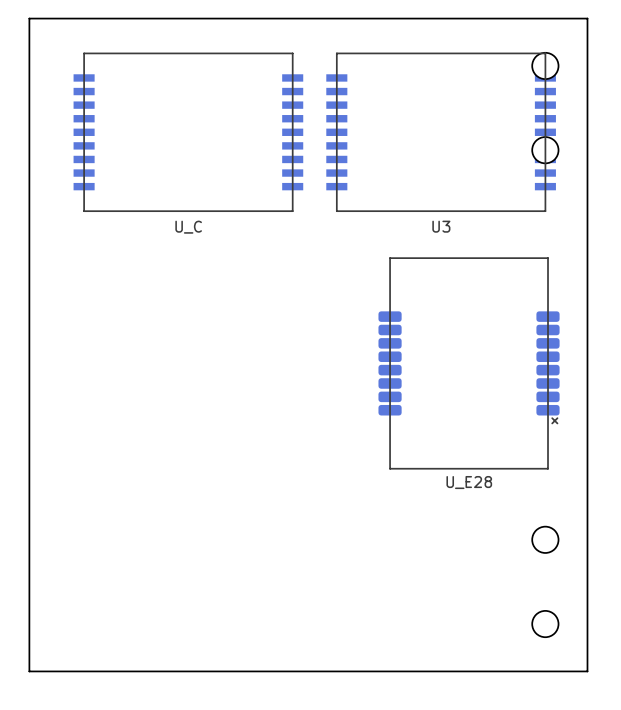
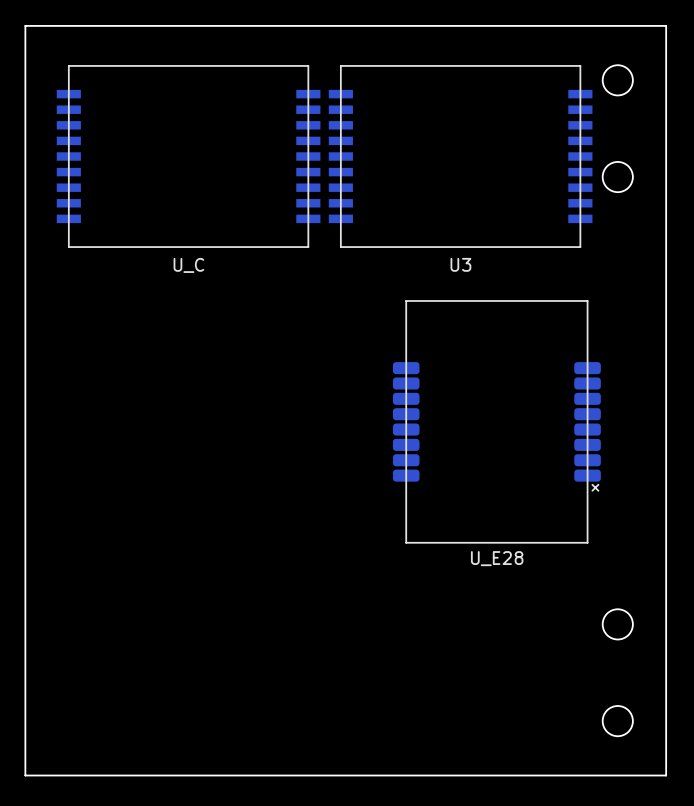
U_C position: (188, 132) -> (188, 156)
U3 position: (441, 132) -> (460, 156)
U_E28 position: (469, 363) -> (496, 421)

